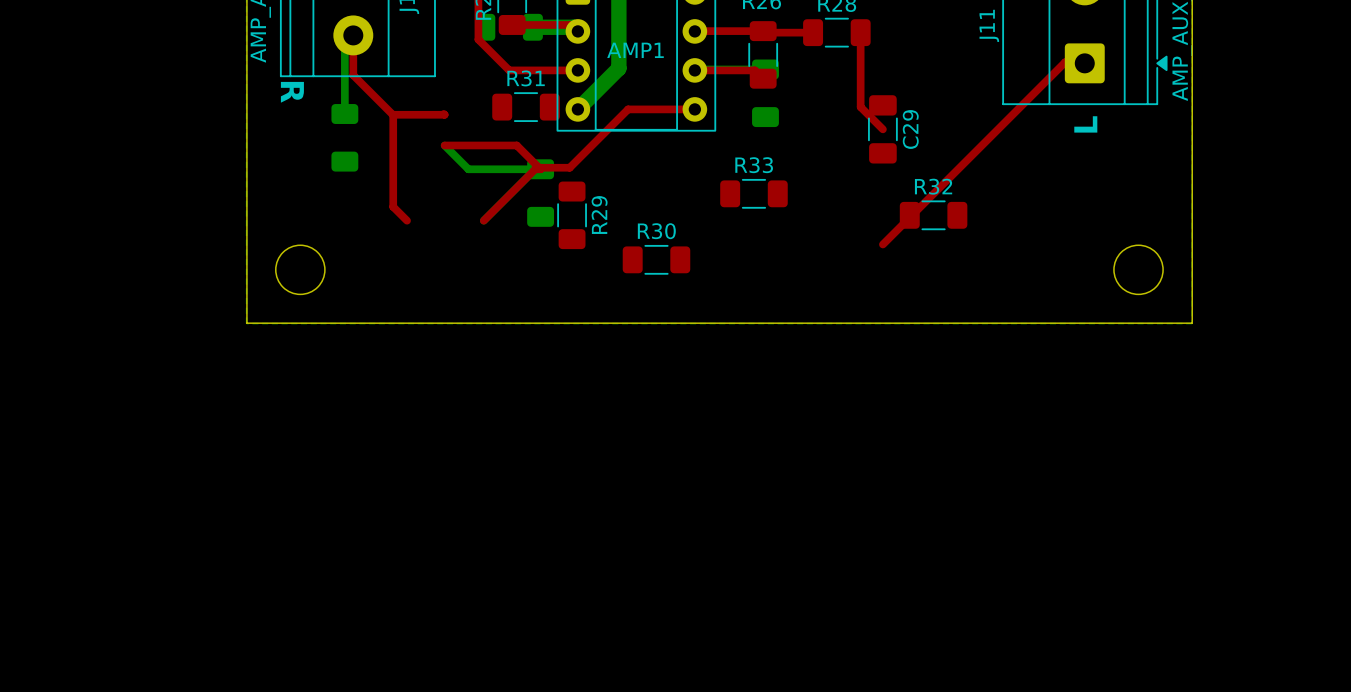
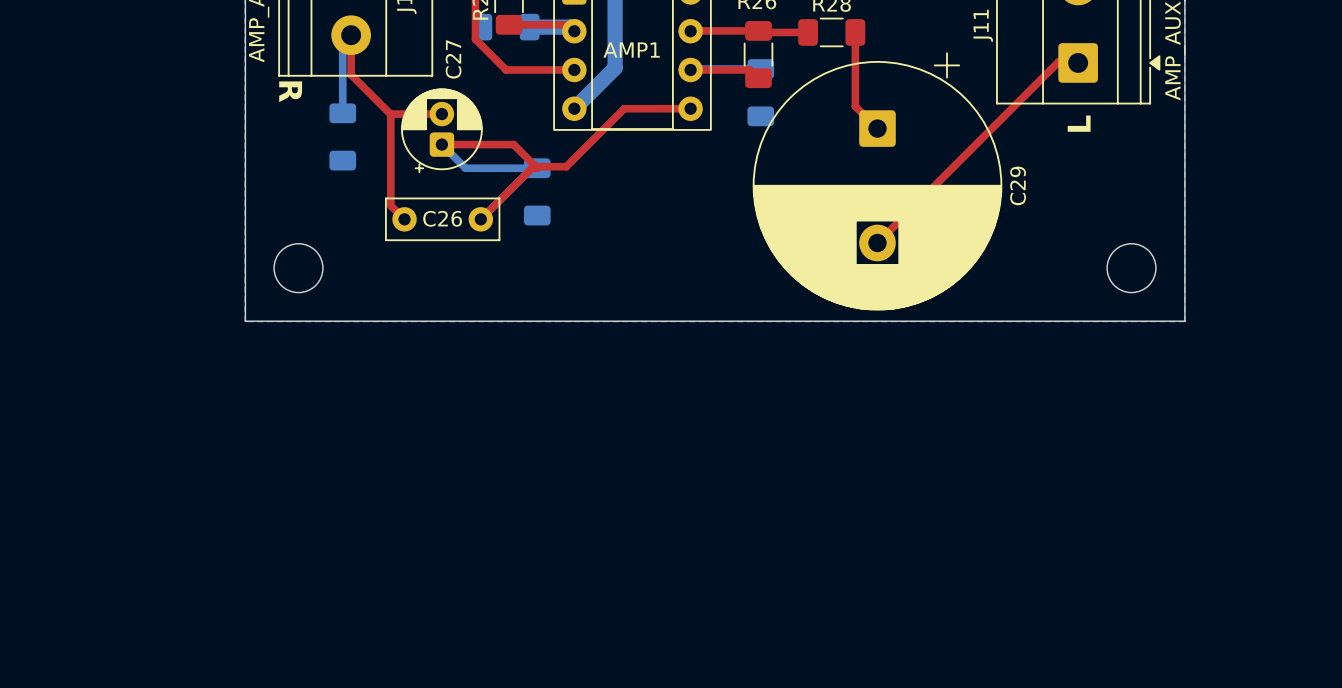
C29 footprint: [868, 95, 898, 164] -> [752, 52, 1003, 311]
R31: (526, 107) -> none
C29 name position: C29 (910, 129) -> C29 (1018, 185)
C27: none -> (441, 130)
R33: (753, 193) -> none
R29: (572, 215) -> none
R32: (933, 215) -> none
C26: none -> (442, 219)
R30: (656, 259) -> none

